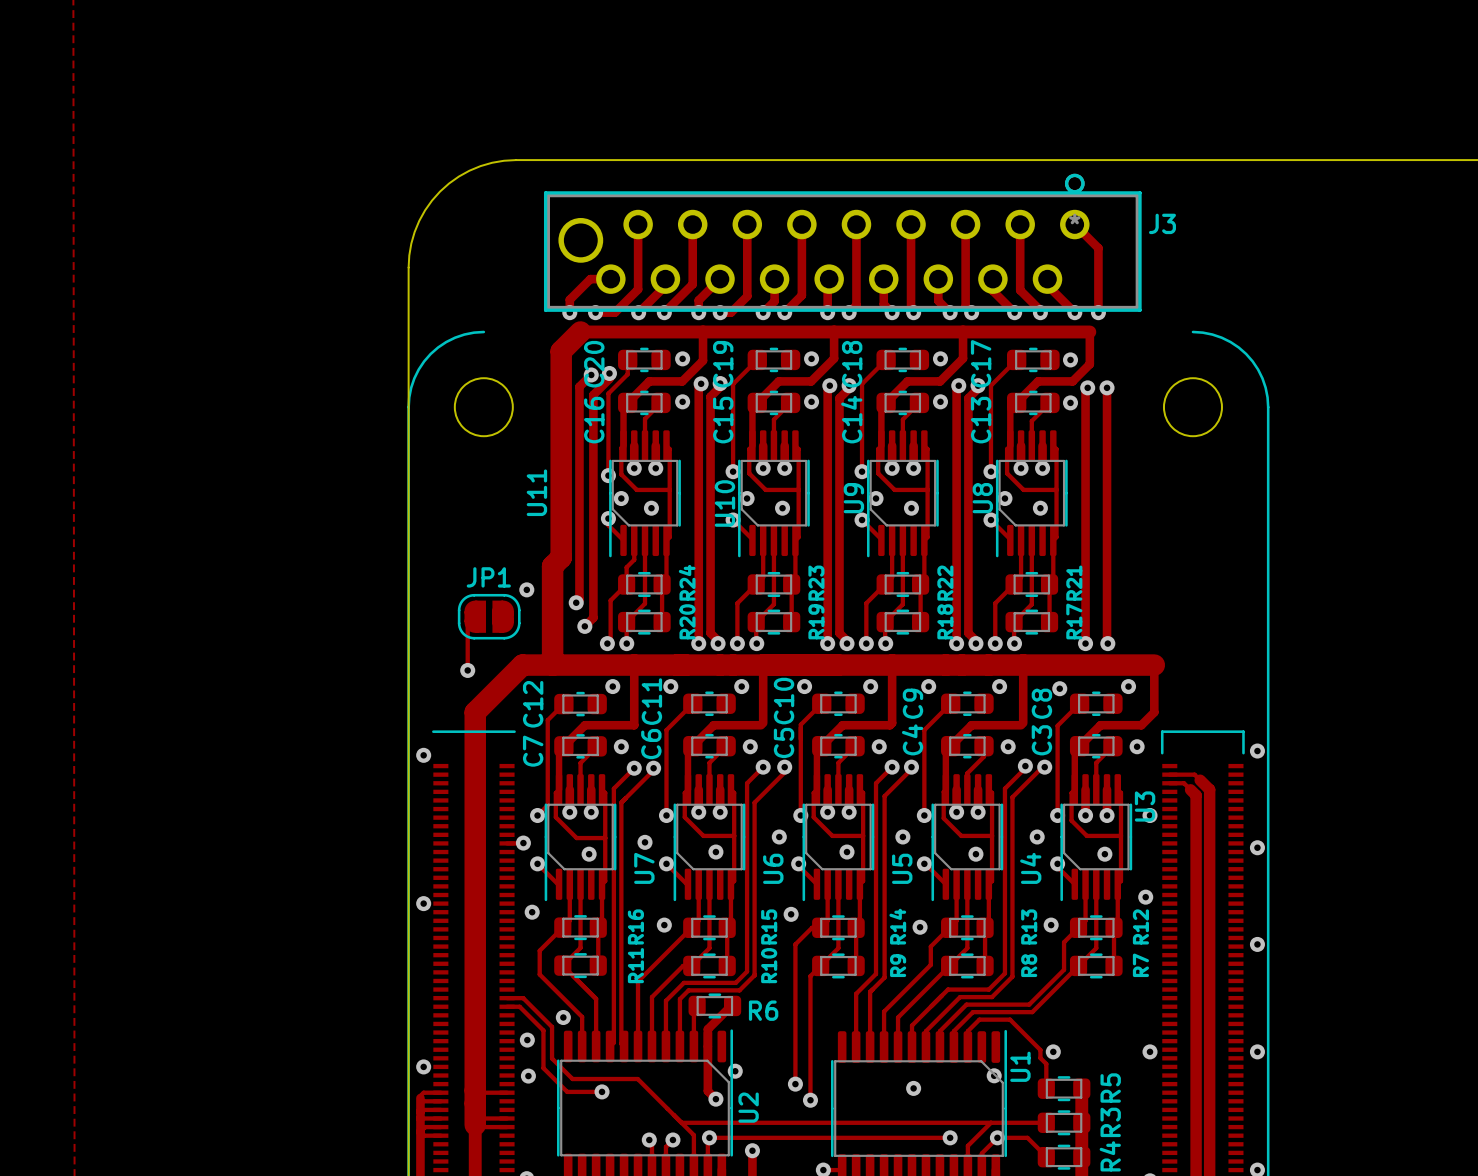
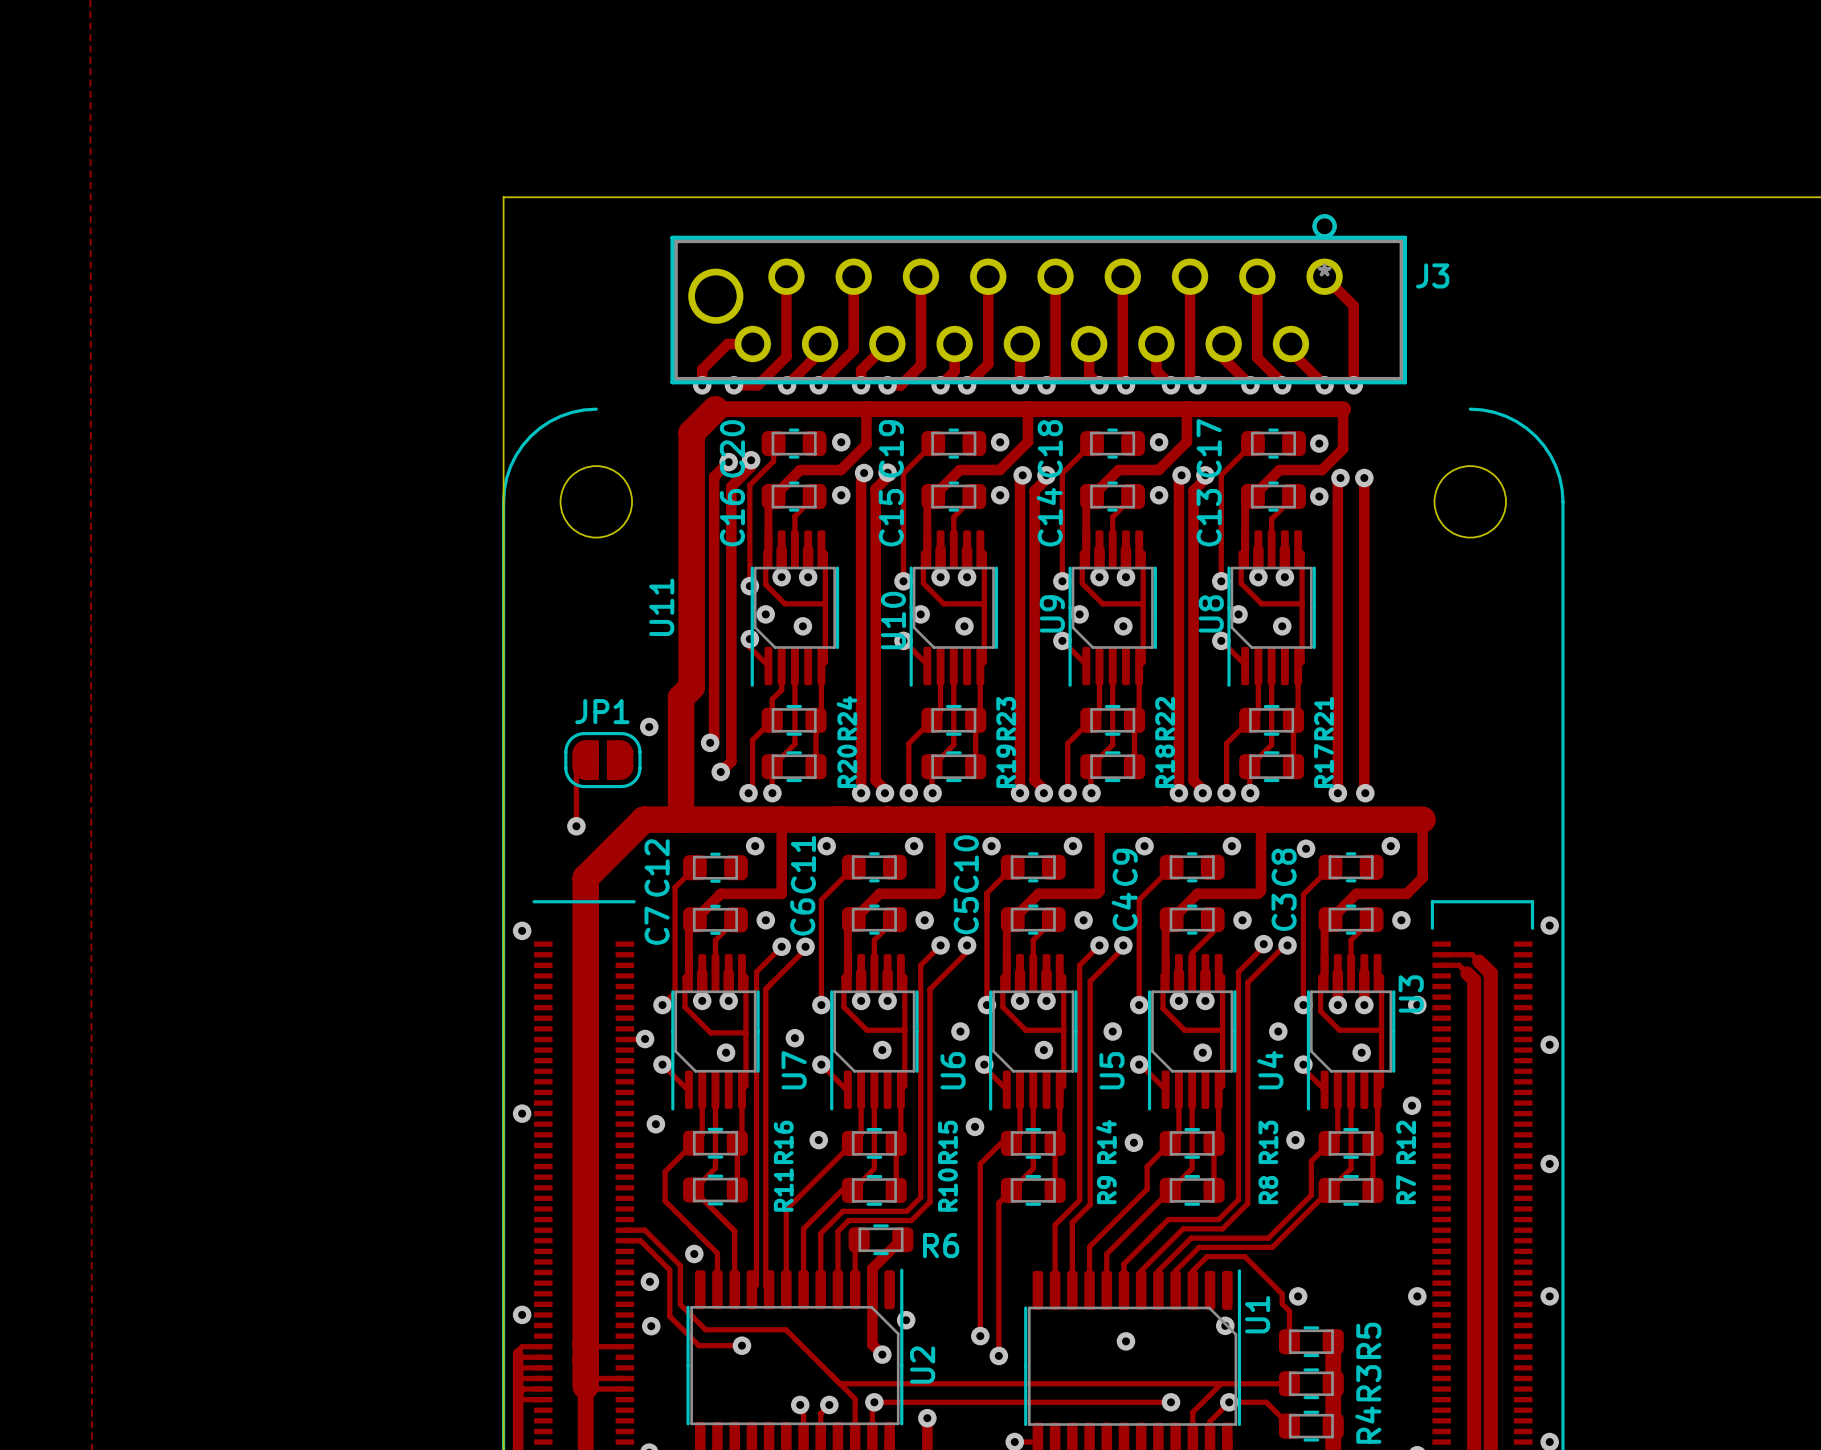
board edge: (516, 160) (480, 166) (458, 176) (440, 191) (425, 210) (414, 232) (408, 267) -> (636, 197) (503, 197) (503, 329)

